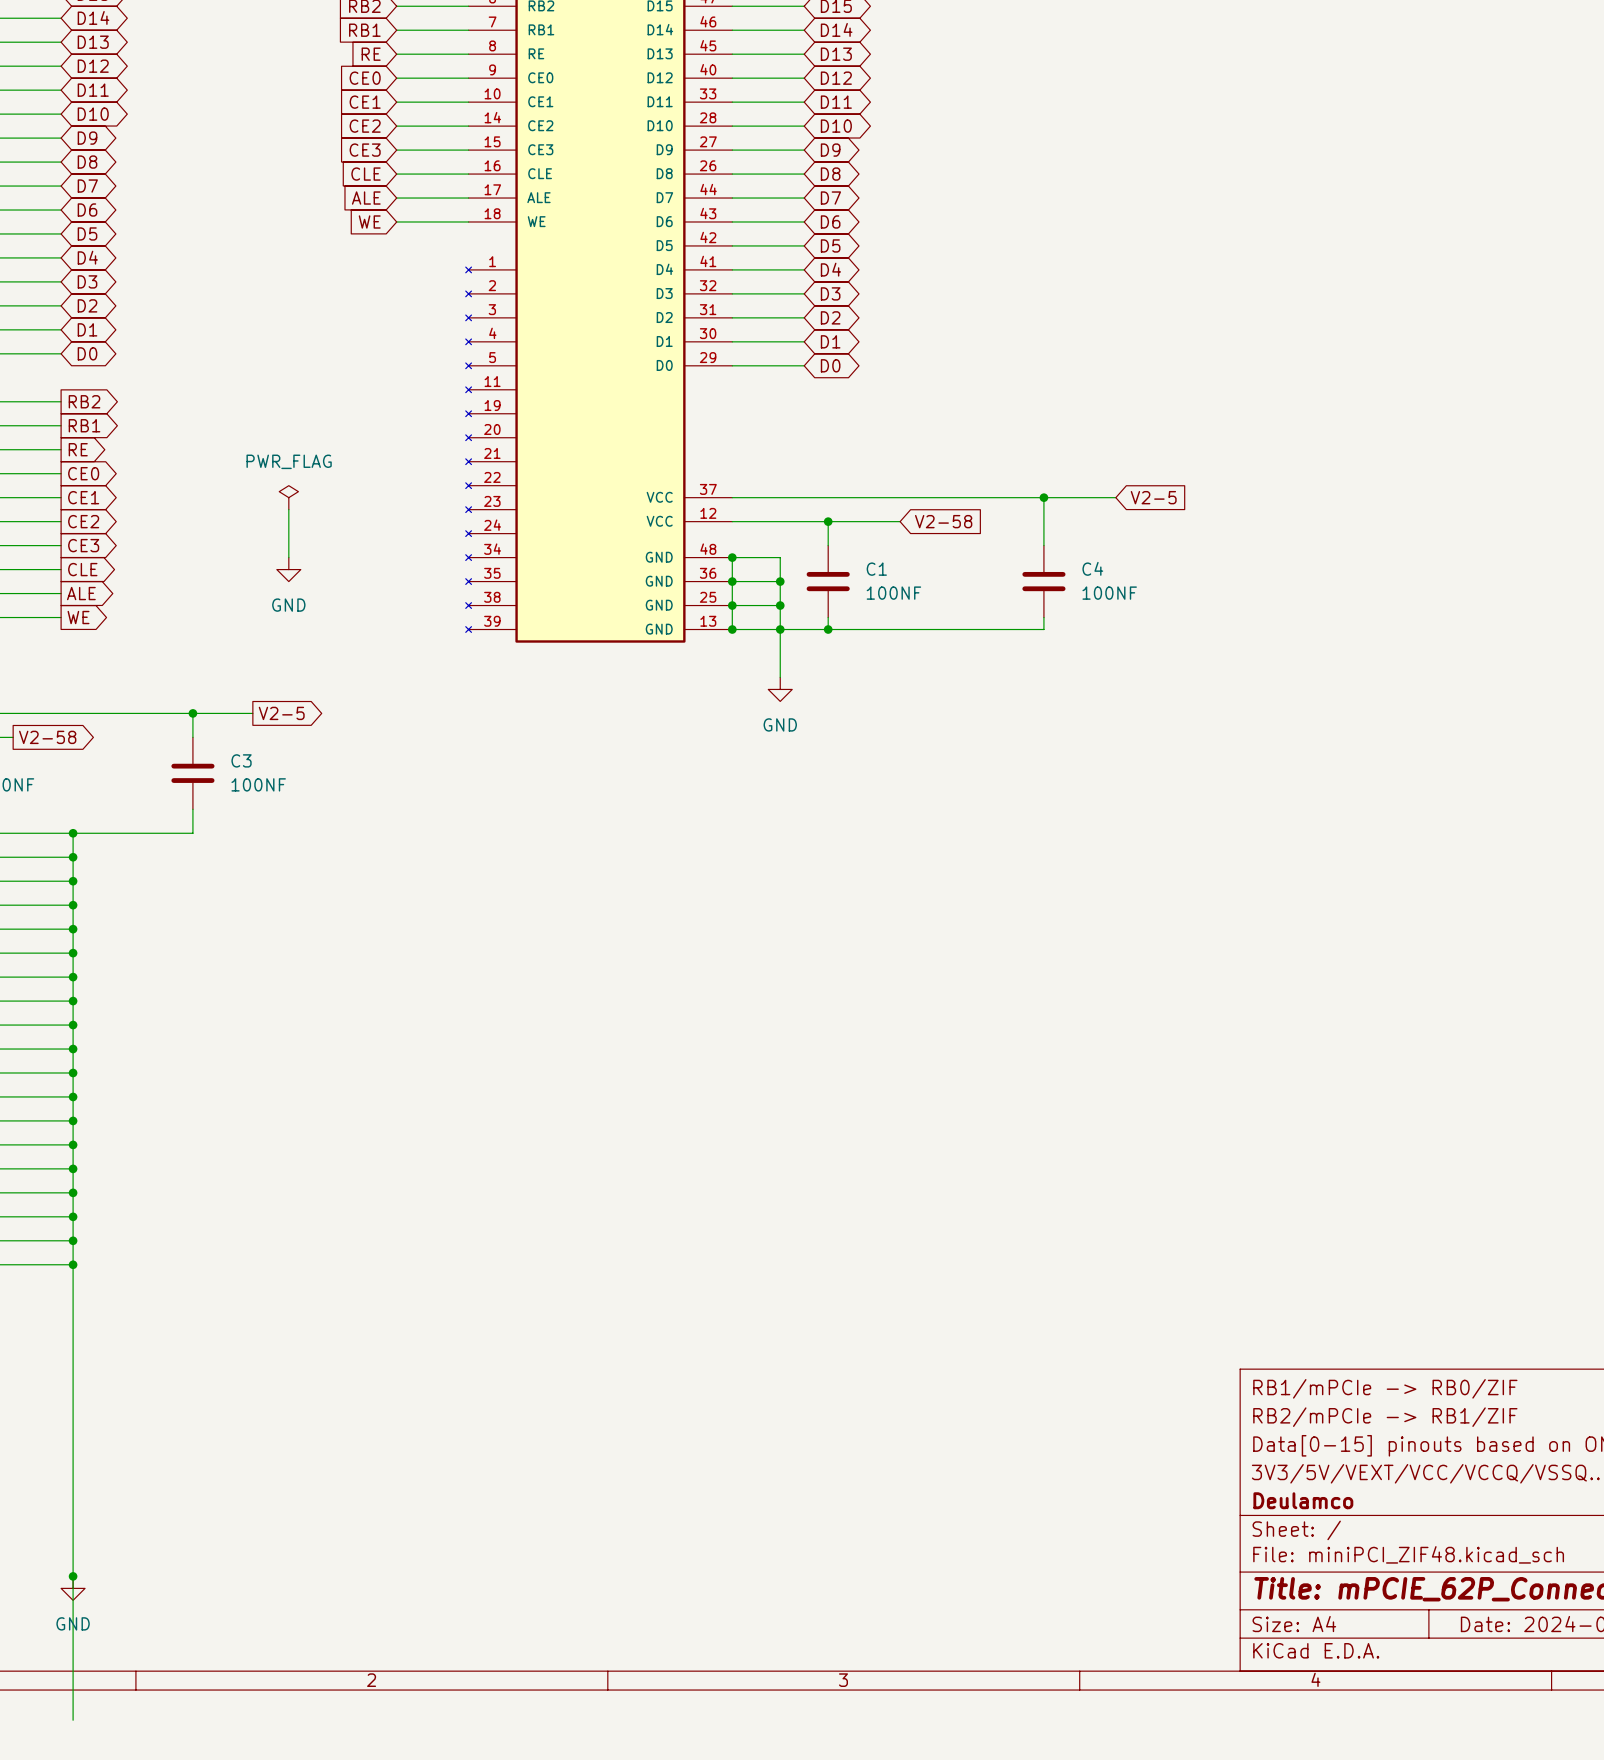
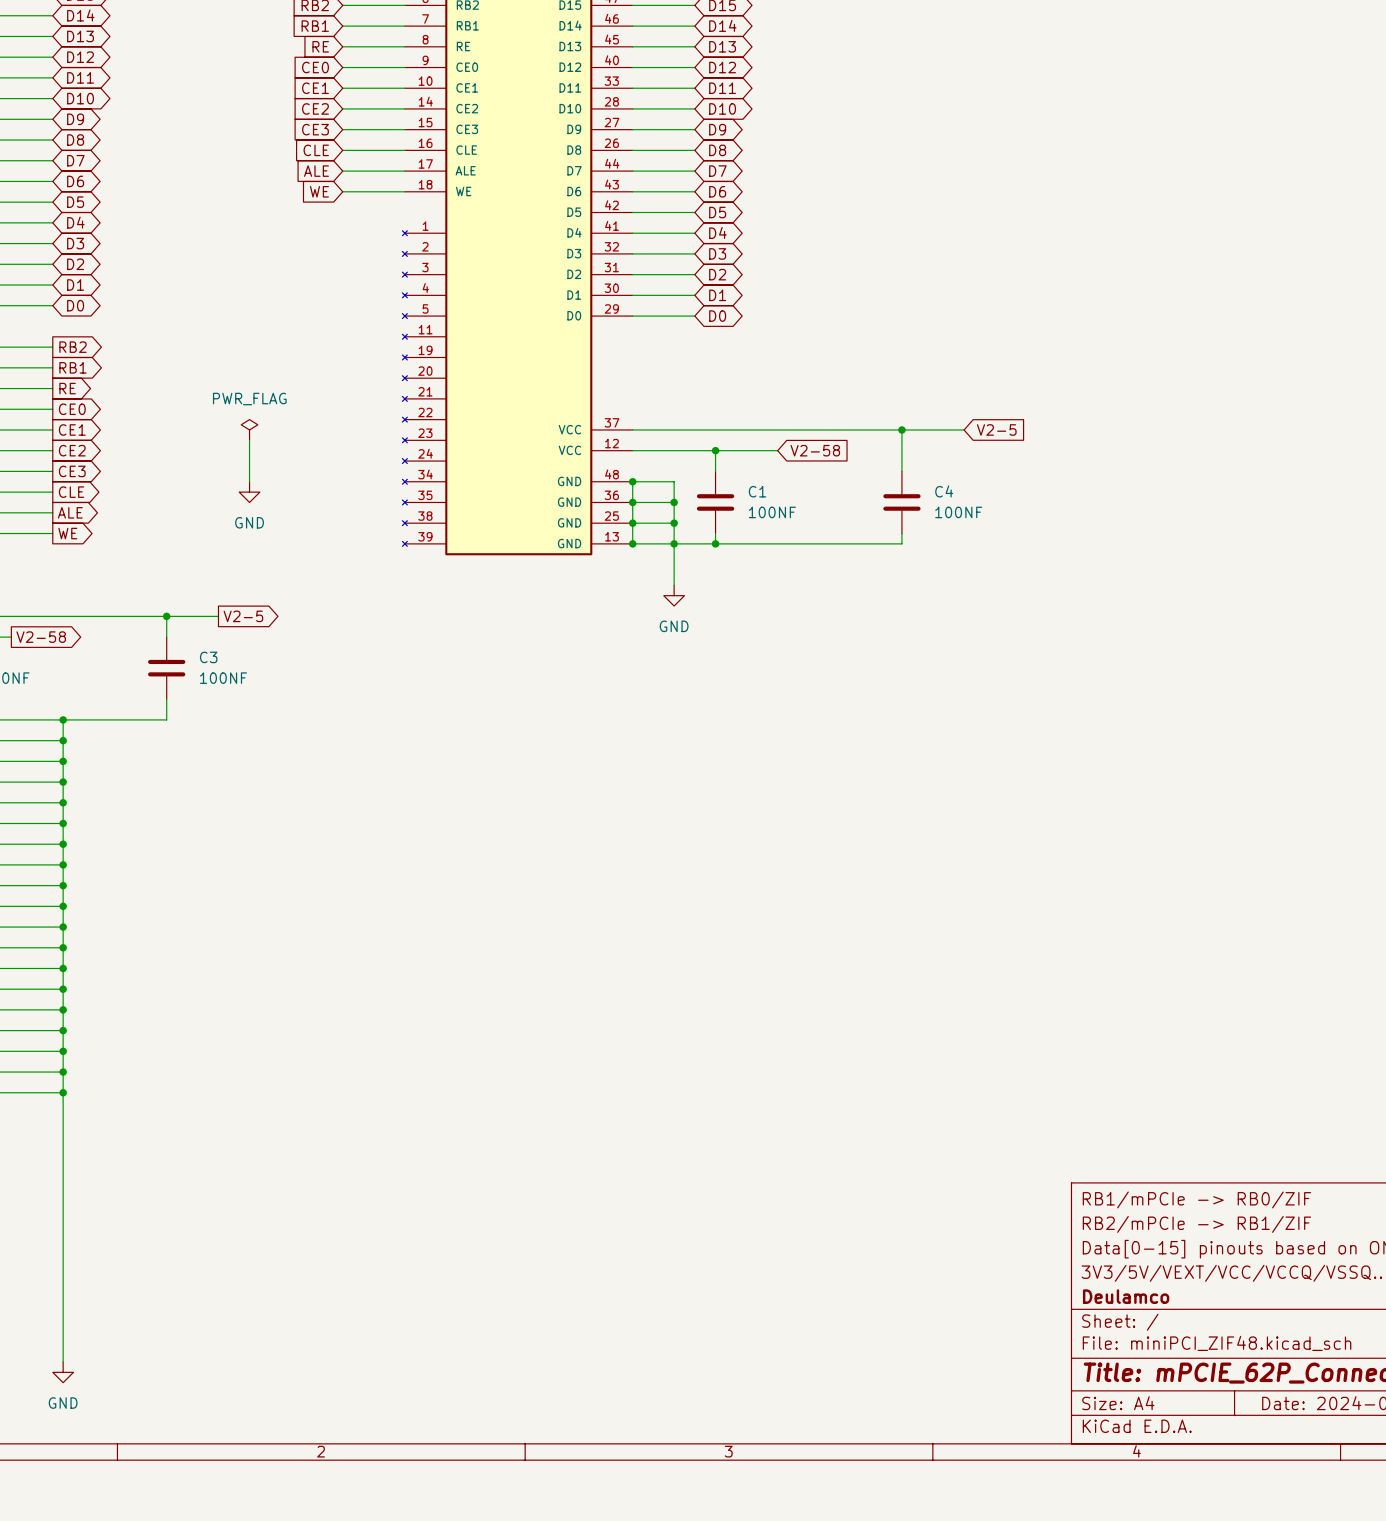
wire: (73, 1576) (73, 1720) -> none
junction: (73, 1576) -> none

